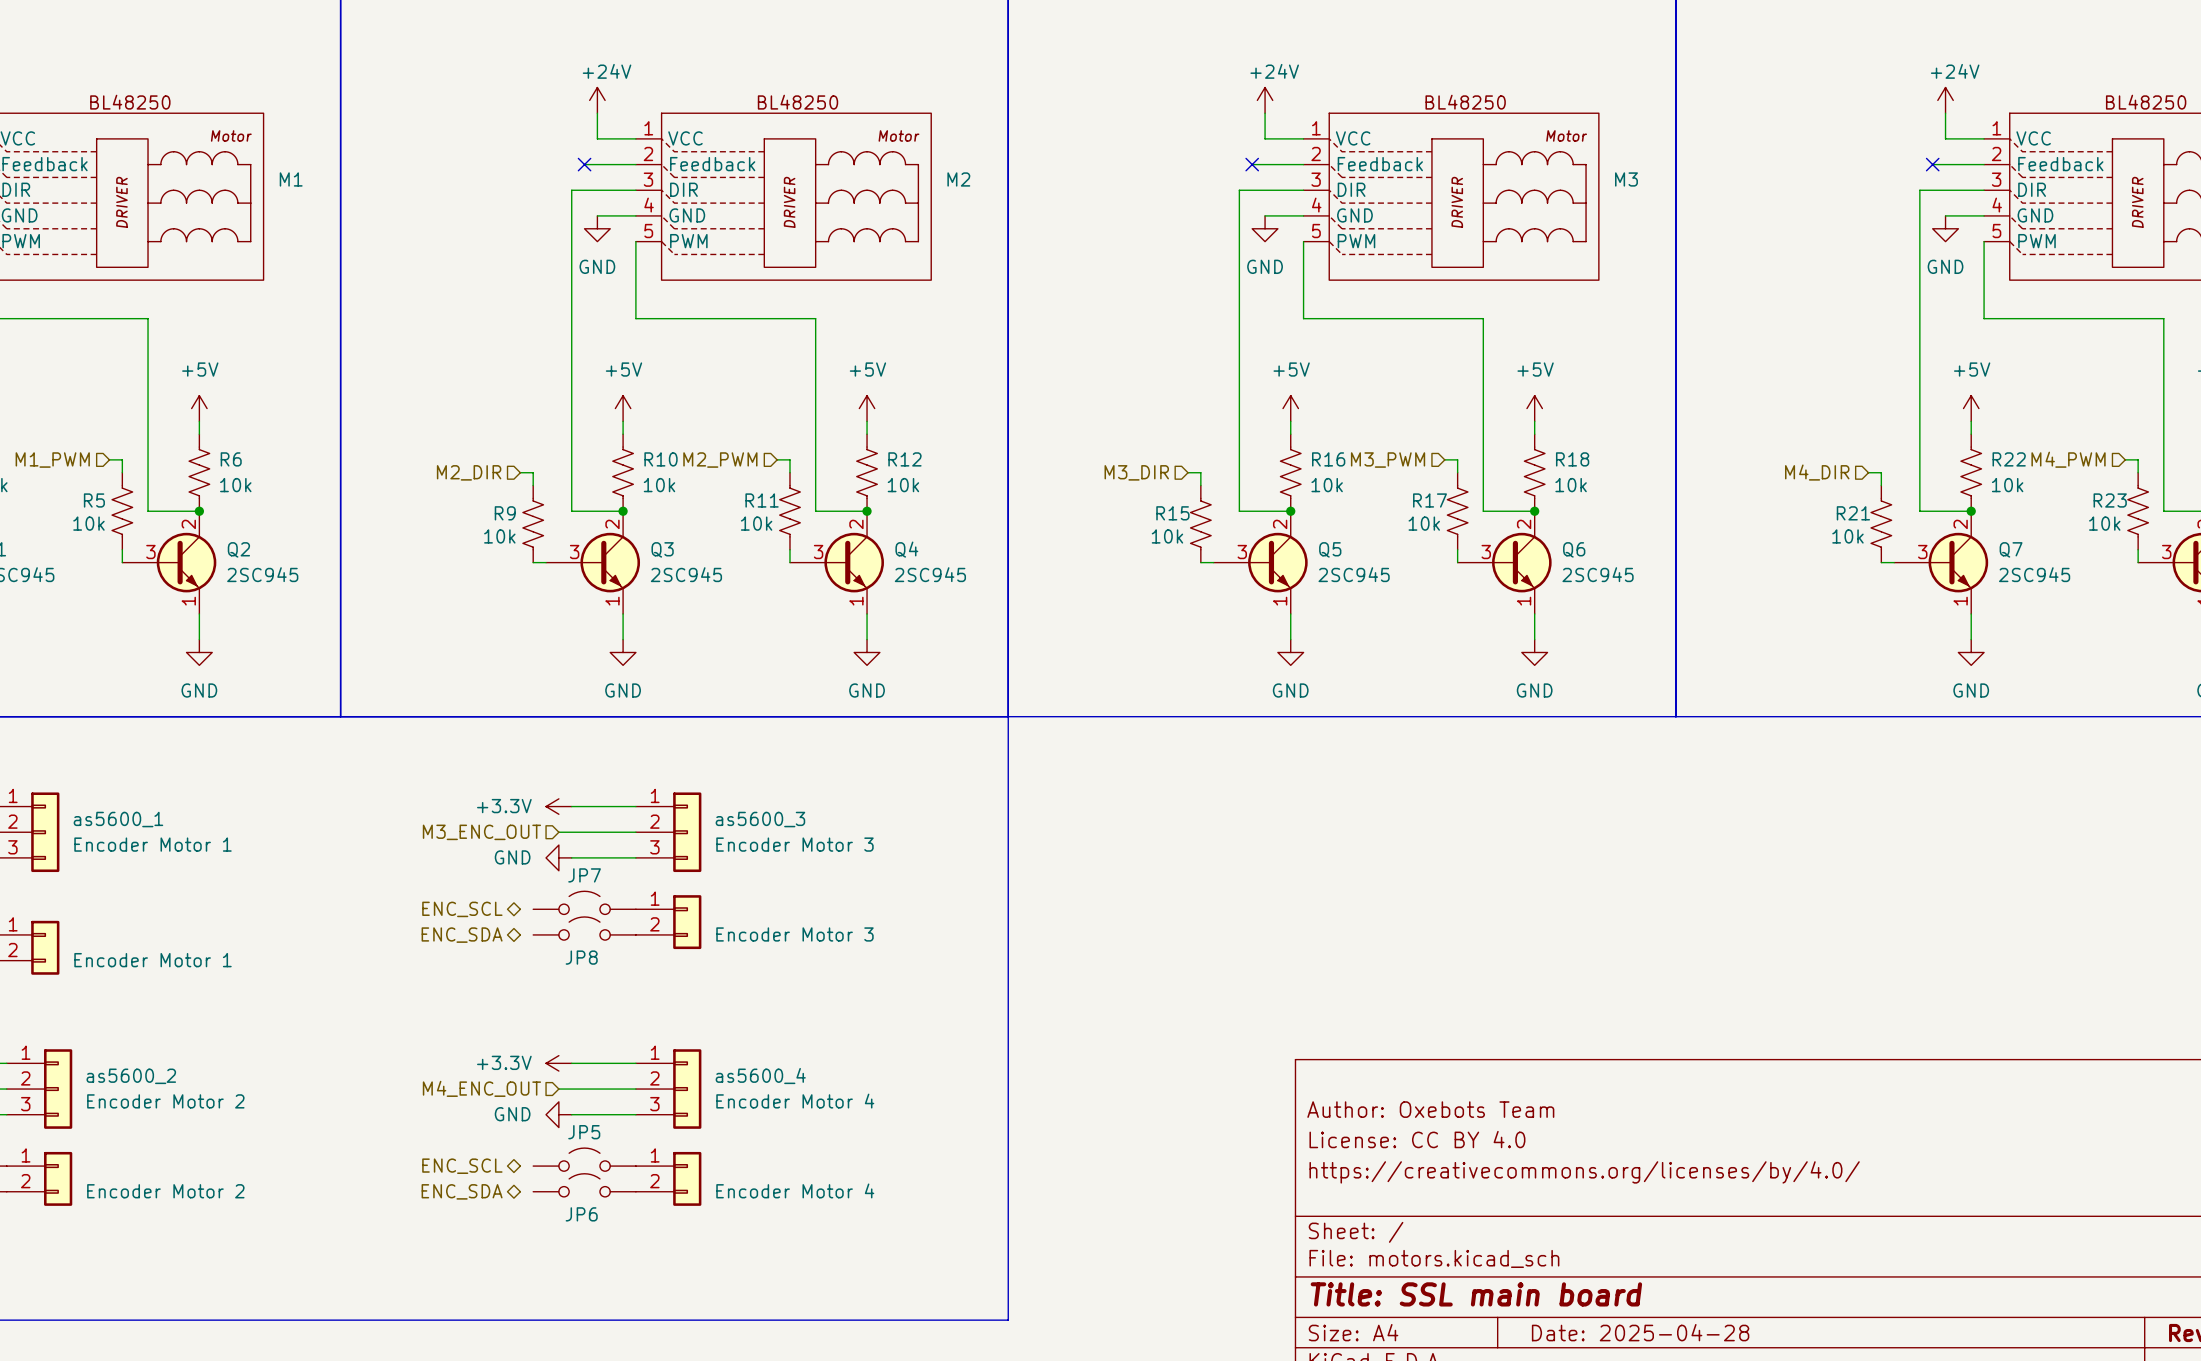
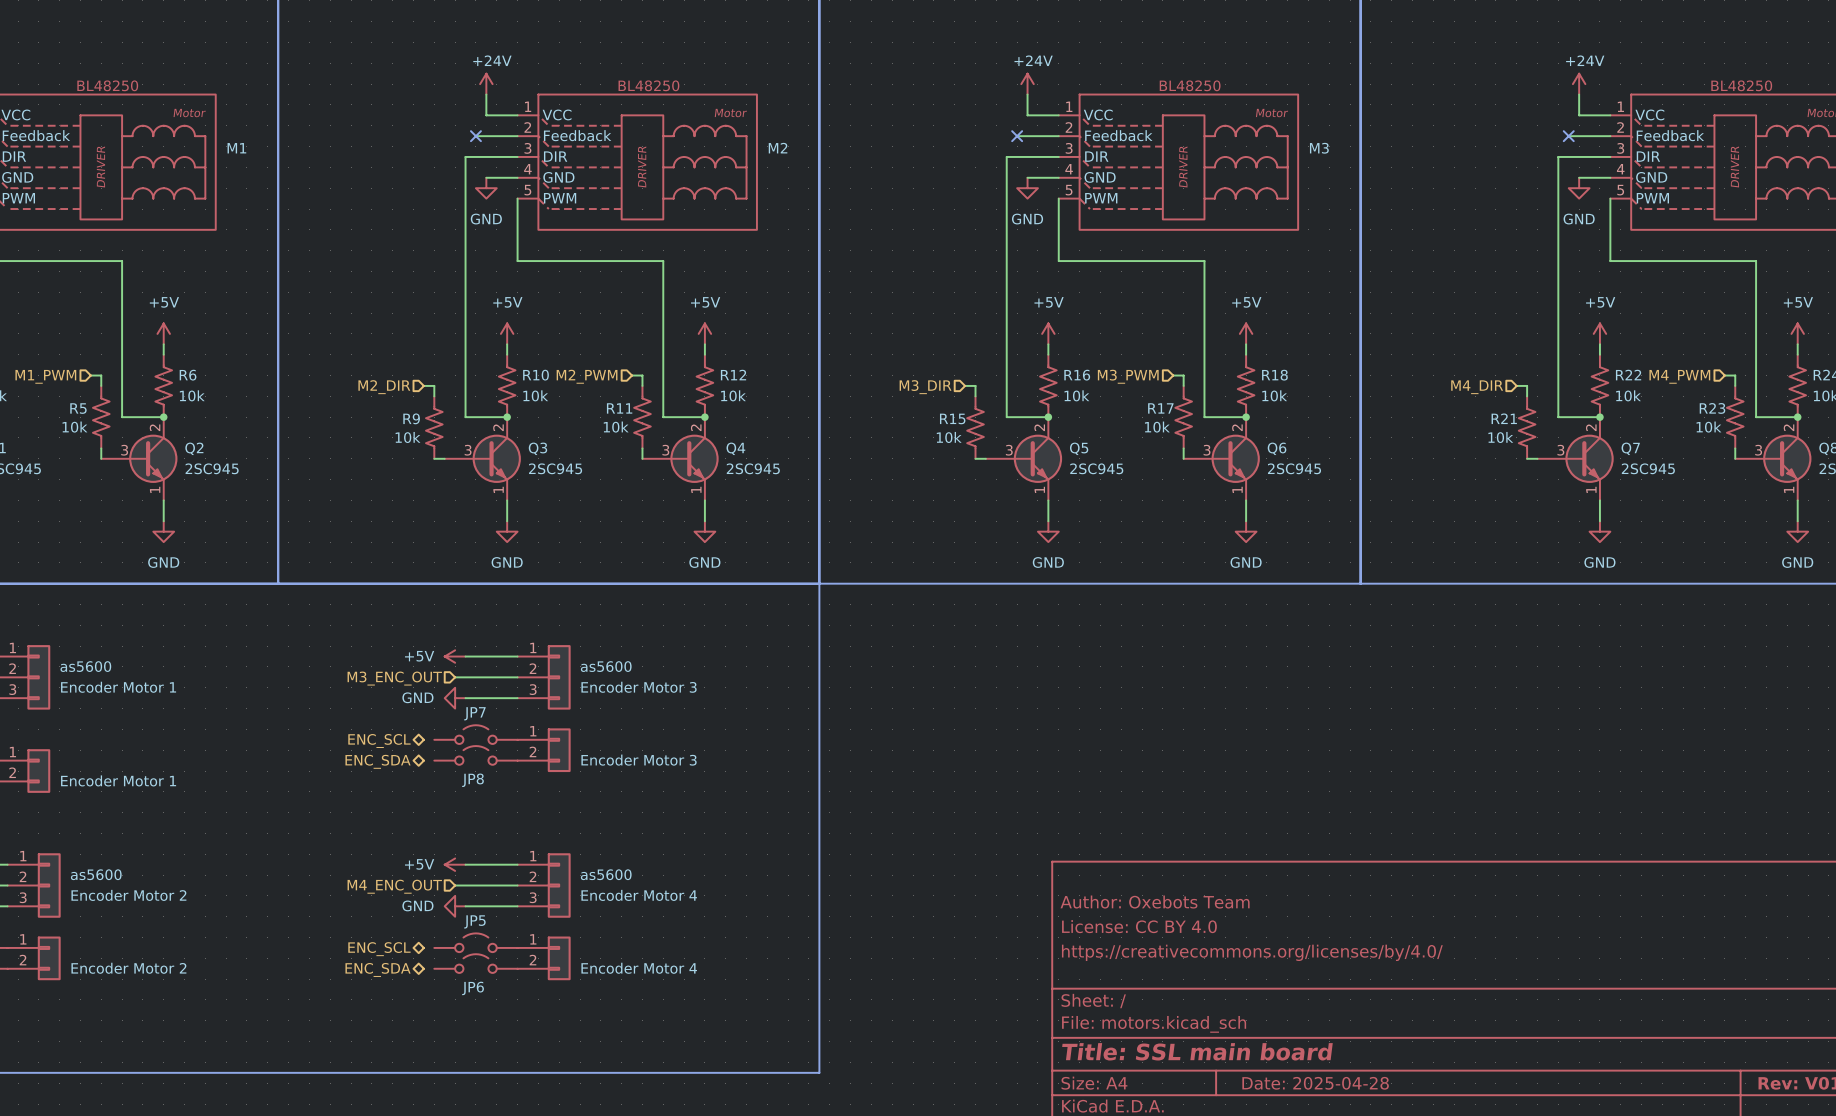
power symbol: +3.3V (558, 806) -> +5V (455, 656)
as5600_1 name: as5600_1 (118, 819) -> as5600 (85, 666)
as5600_3 name: as5600_3 (760, 819) -> as5600 (606, 666)
power symbol: +3.3V (558, 1063) -> +5V (455, 864)
as5600_2 name: as5600_2 (131, 1076) -> as5600 (96, 874)
as5600_4 name: as5600_4 (760, 1076) -> as5600 (606, 874)

